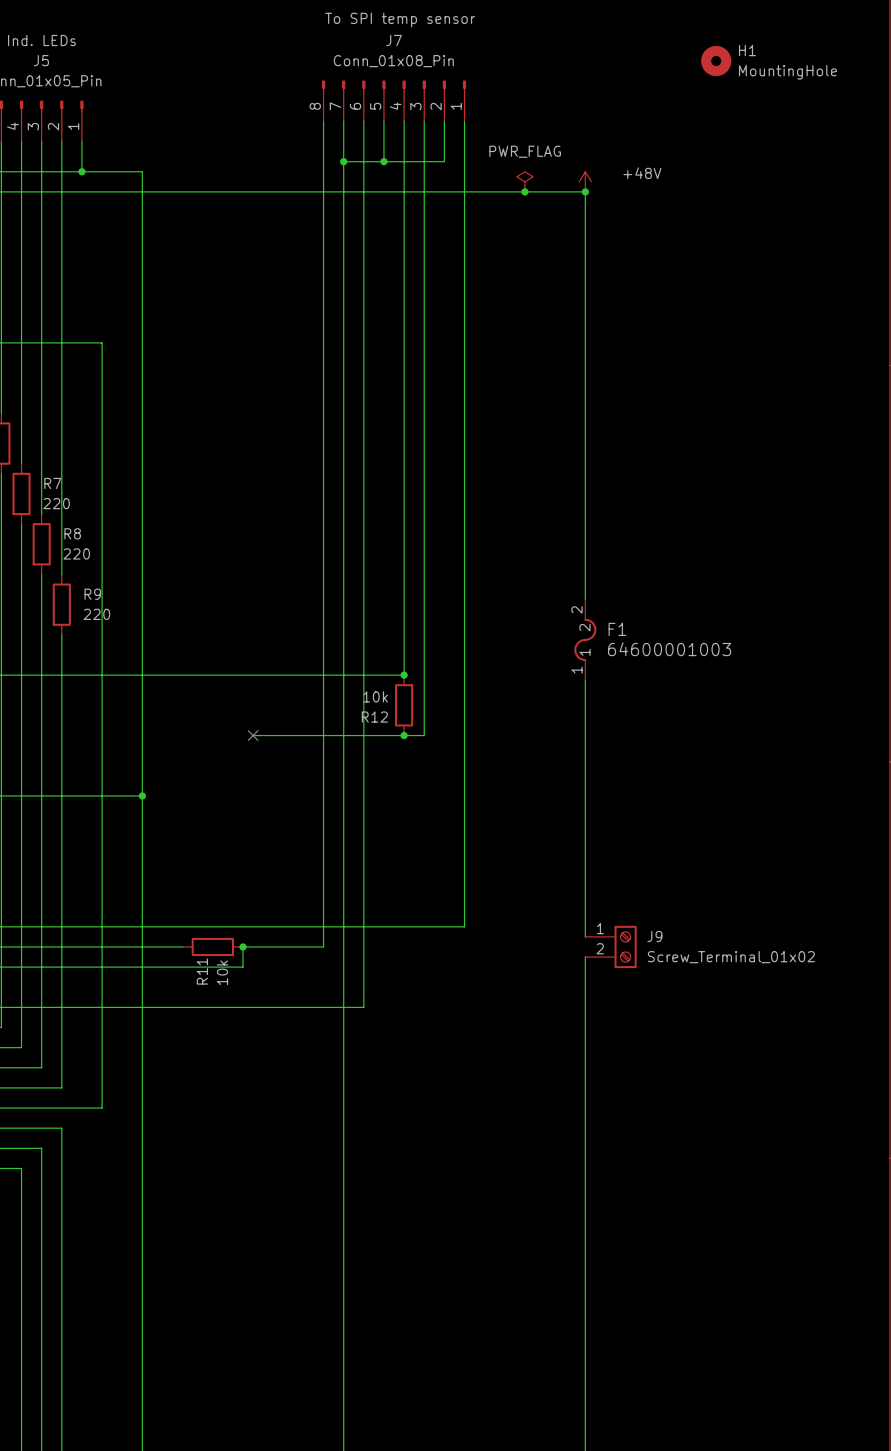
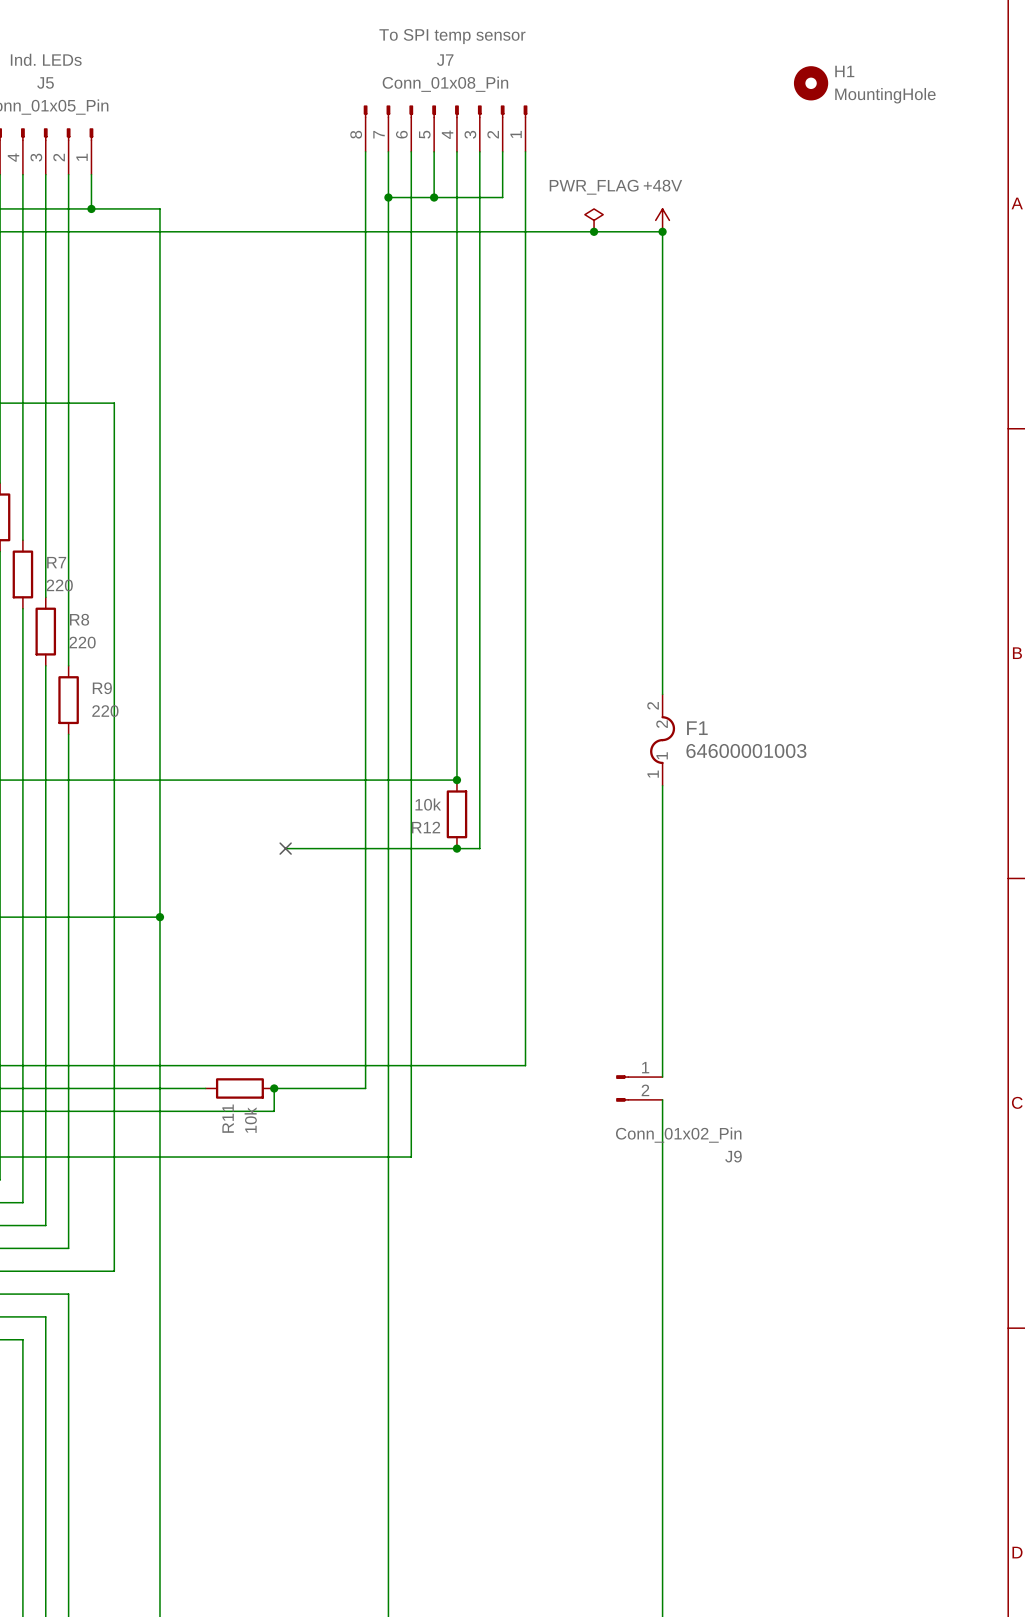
power symbol text position: +48V (642, 173) -> +48V (662, 185)
J9 symbol: [585, 925, 637, 969] -> [616, 1075, 663, 1102]
J9 name position: J9 (654, 936) -> J9 (733, 1156)
J9 value: Screw_Terminal_01x02 (731, 957) -> Conn_01x02_Pin (678, 1135)

